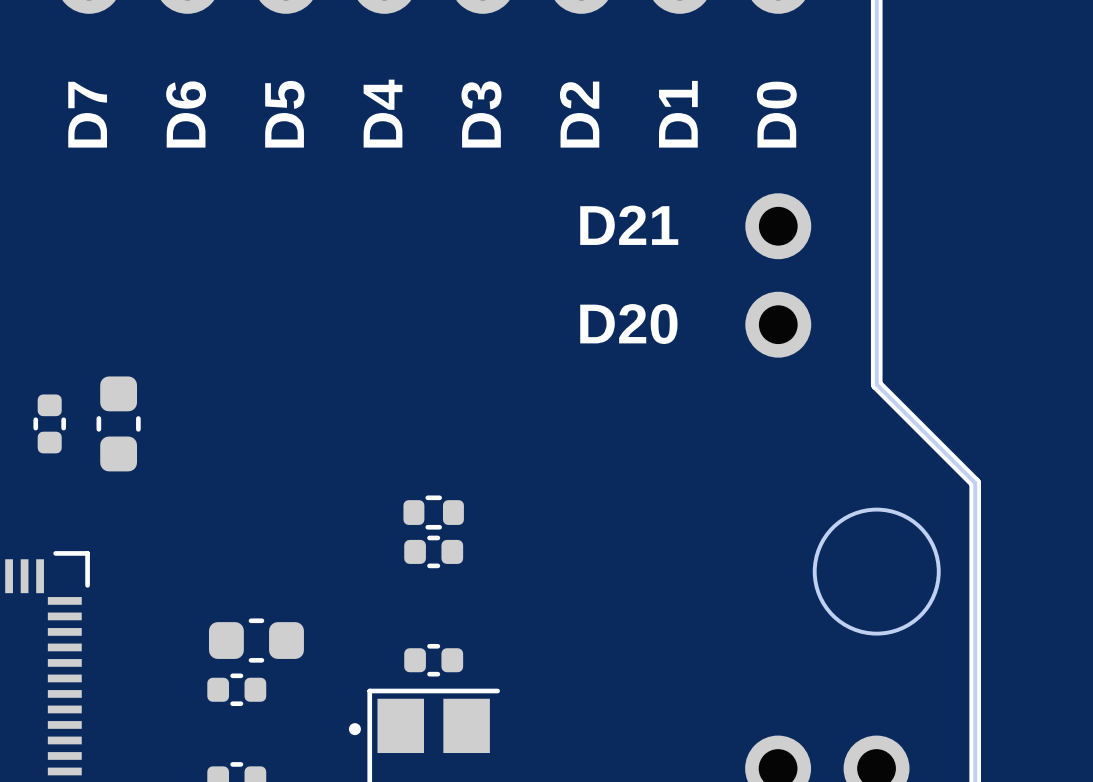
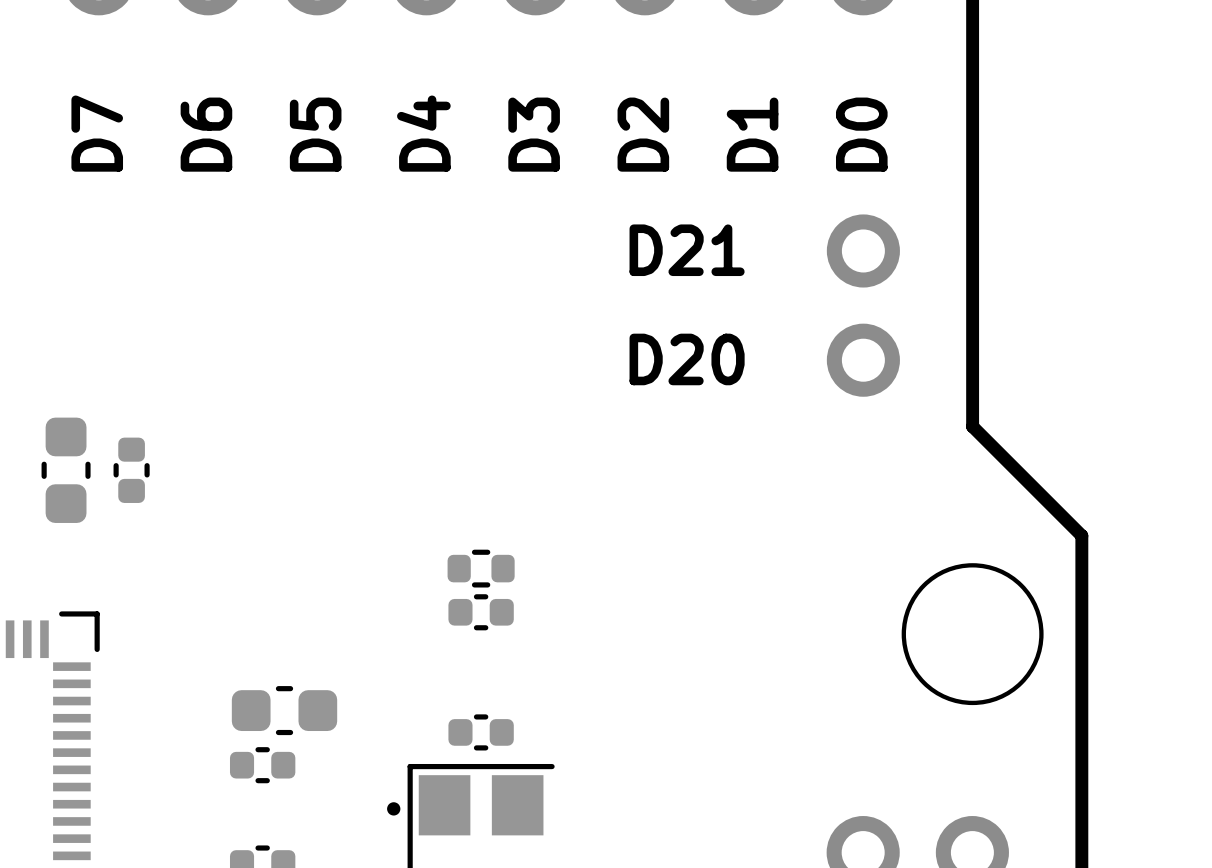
part footprint: [96, 376, 141, 472] -> [113, 437, 150, 503]
part footprint: [33, 394, 66, 454] -> [41, 417, 91, 523]

